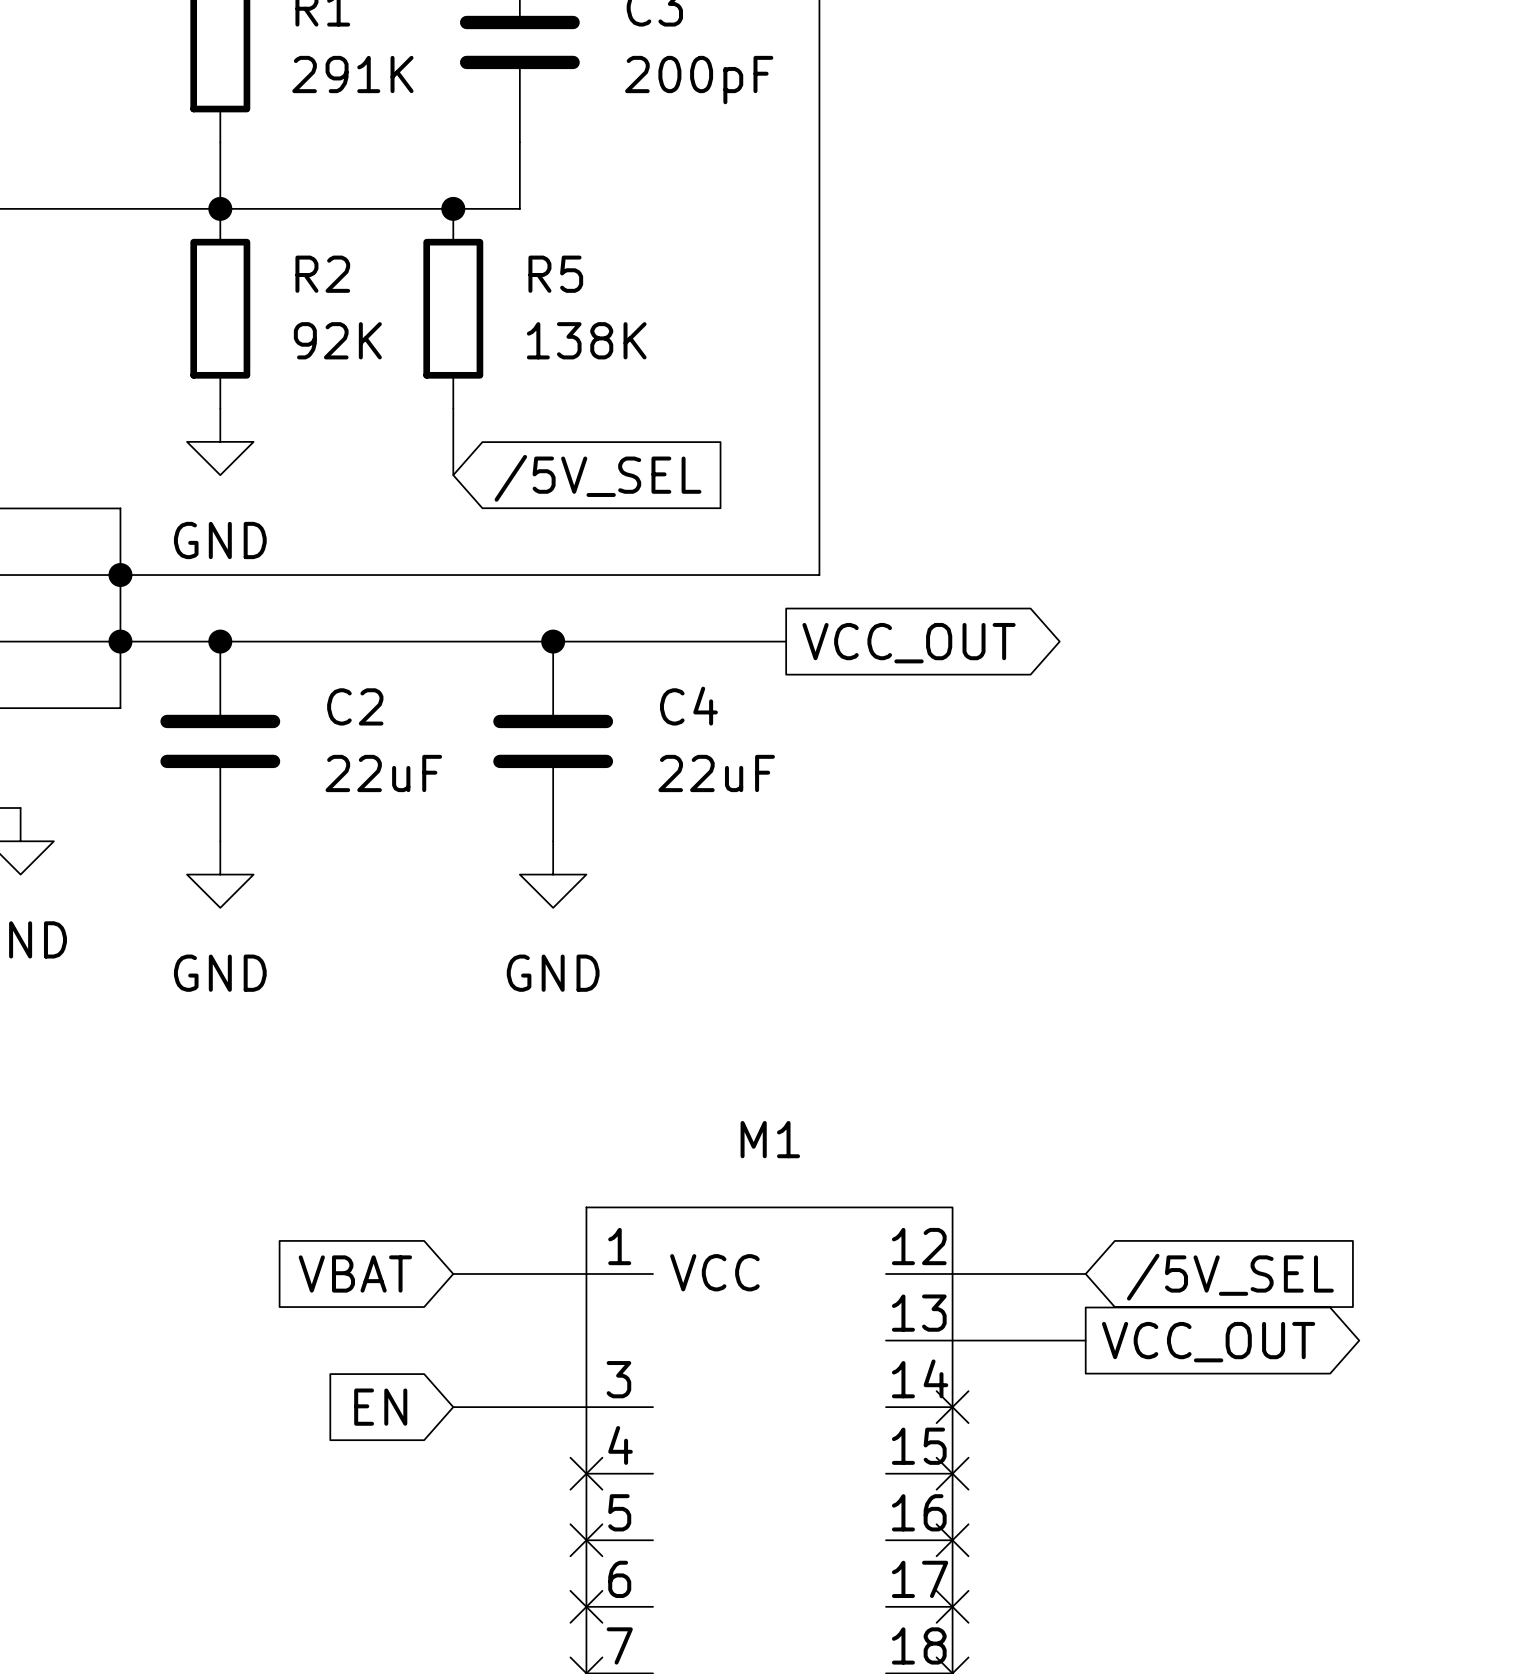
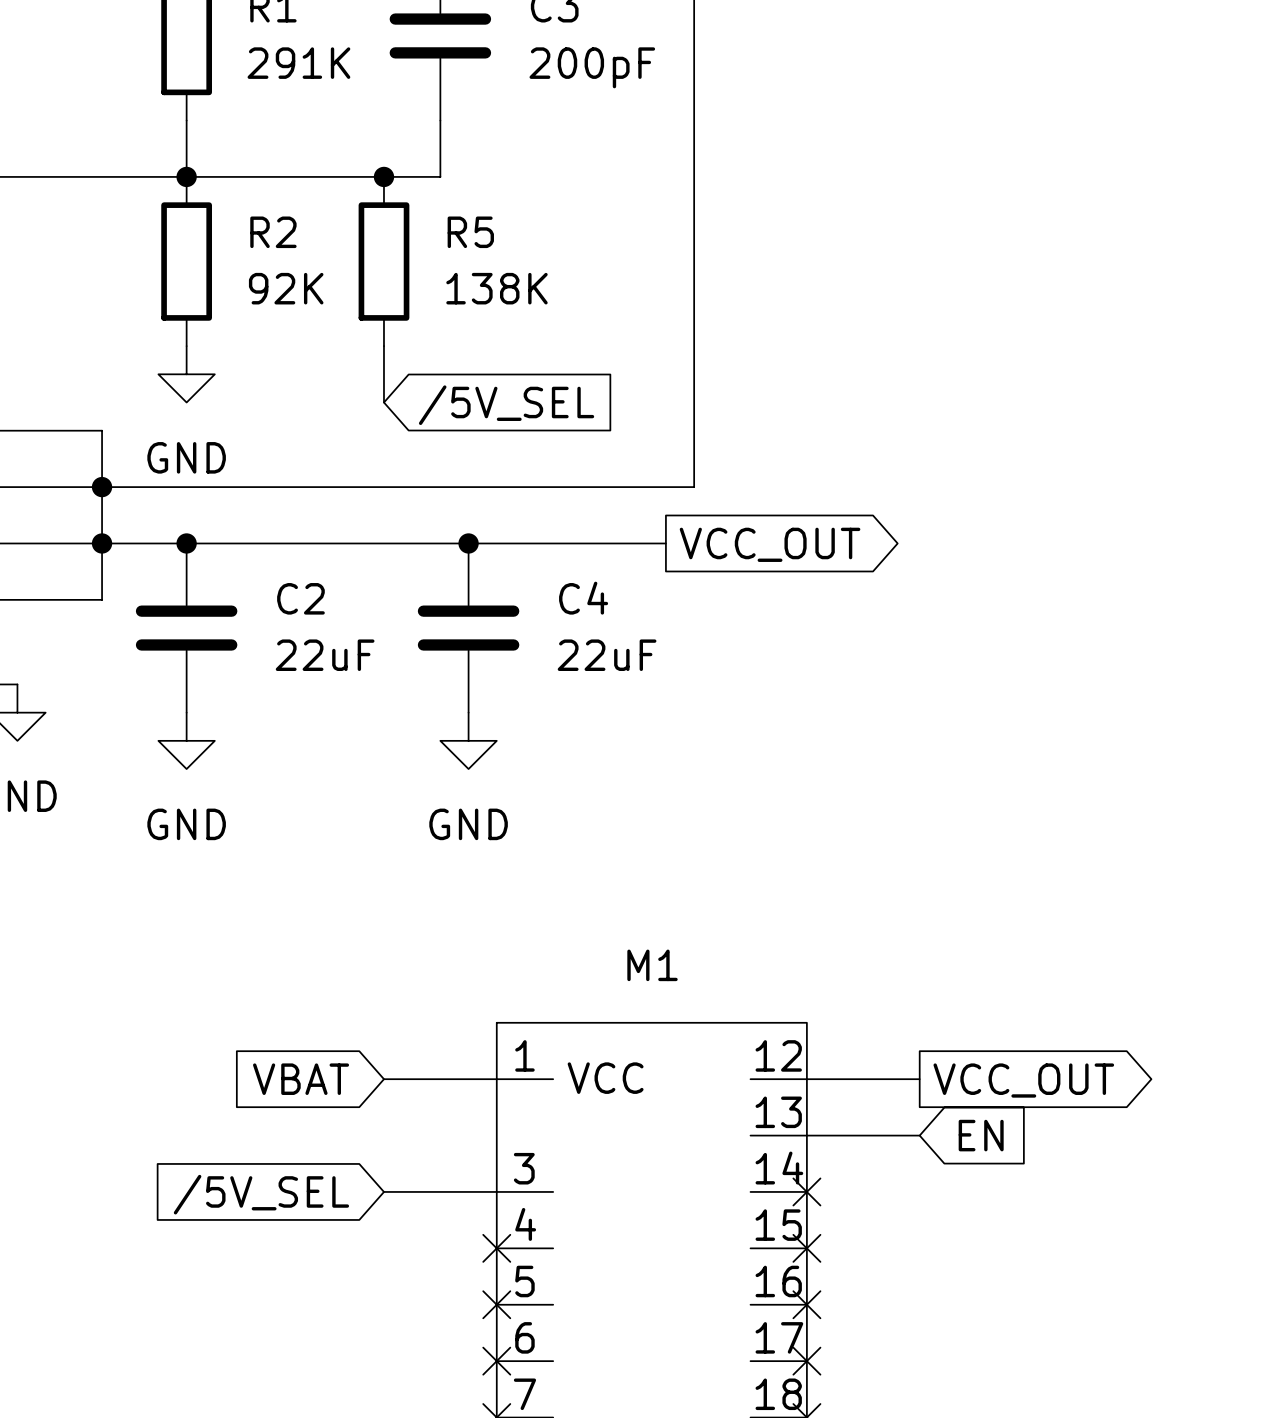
global label shape: input (1230, 1277) -> output (1023, 1080)
global label: /5V_SEL (1230, 1277) -> VCC_OUT (1023, 1080)
global label shape: output (1208, 1342) -> input (981, 1135)
global label: VCC_OUT (1208, 1342) -> EN (981, 1135)
global label: EN (380, 1407) -> /5V_SEL (261, 1194)

